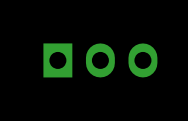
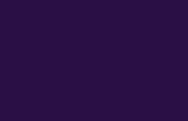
part: (100, 60) -> none

